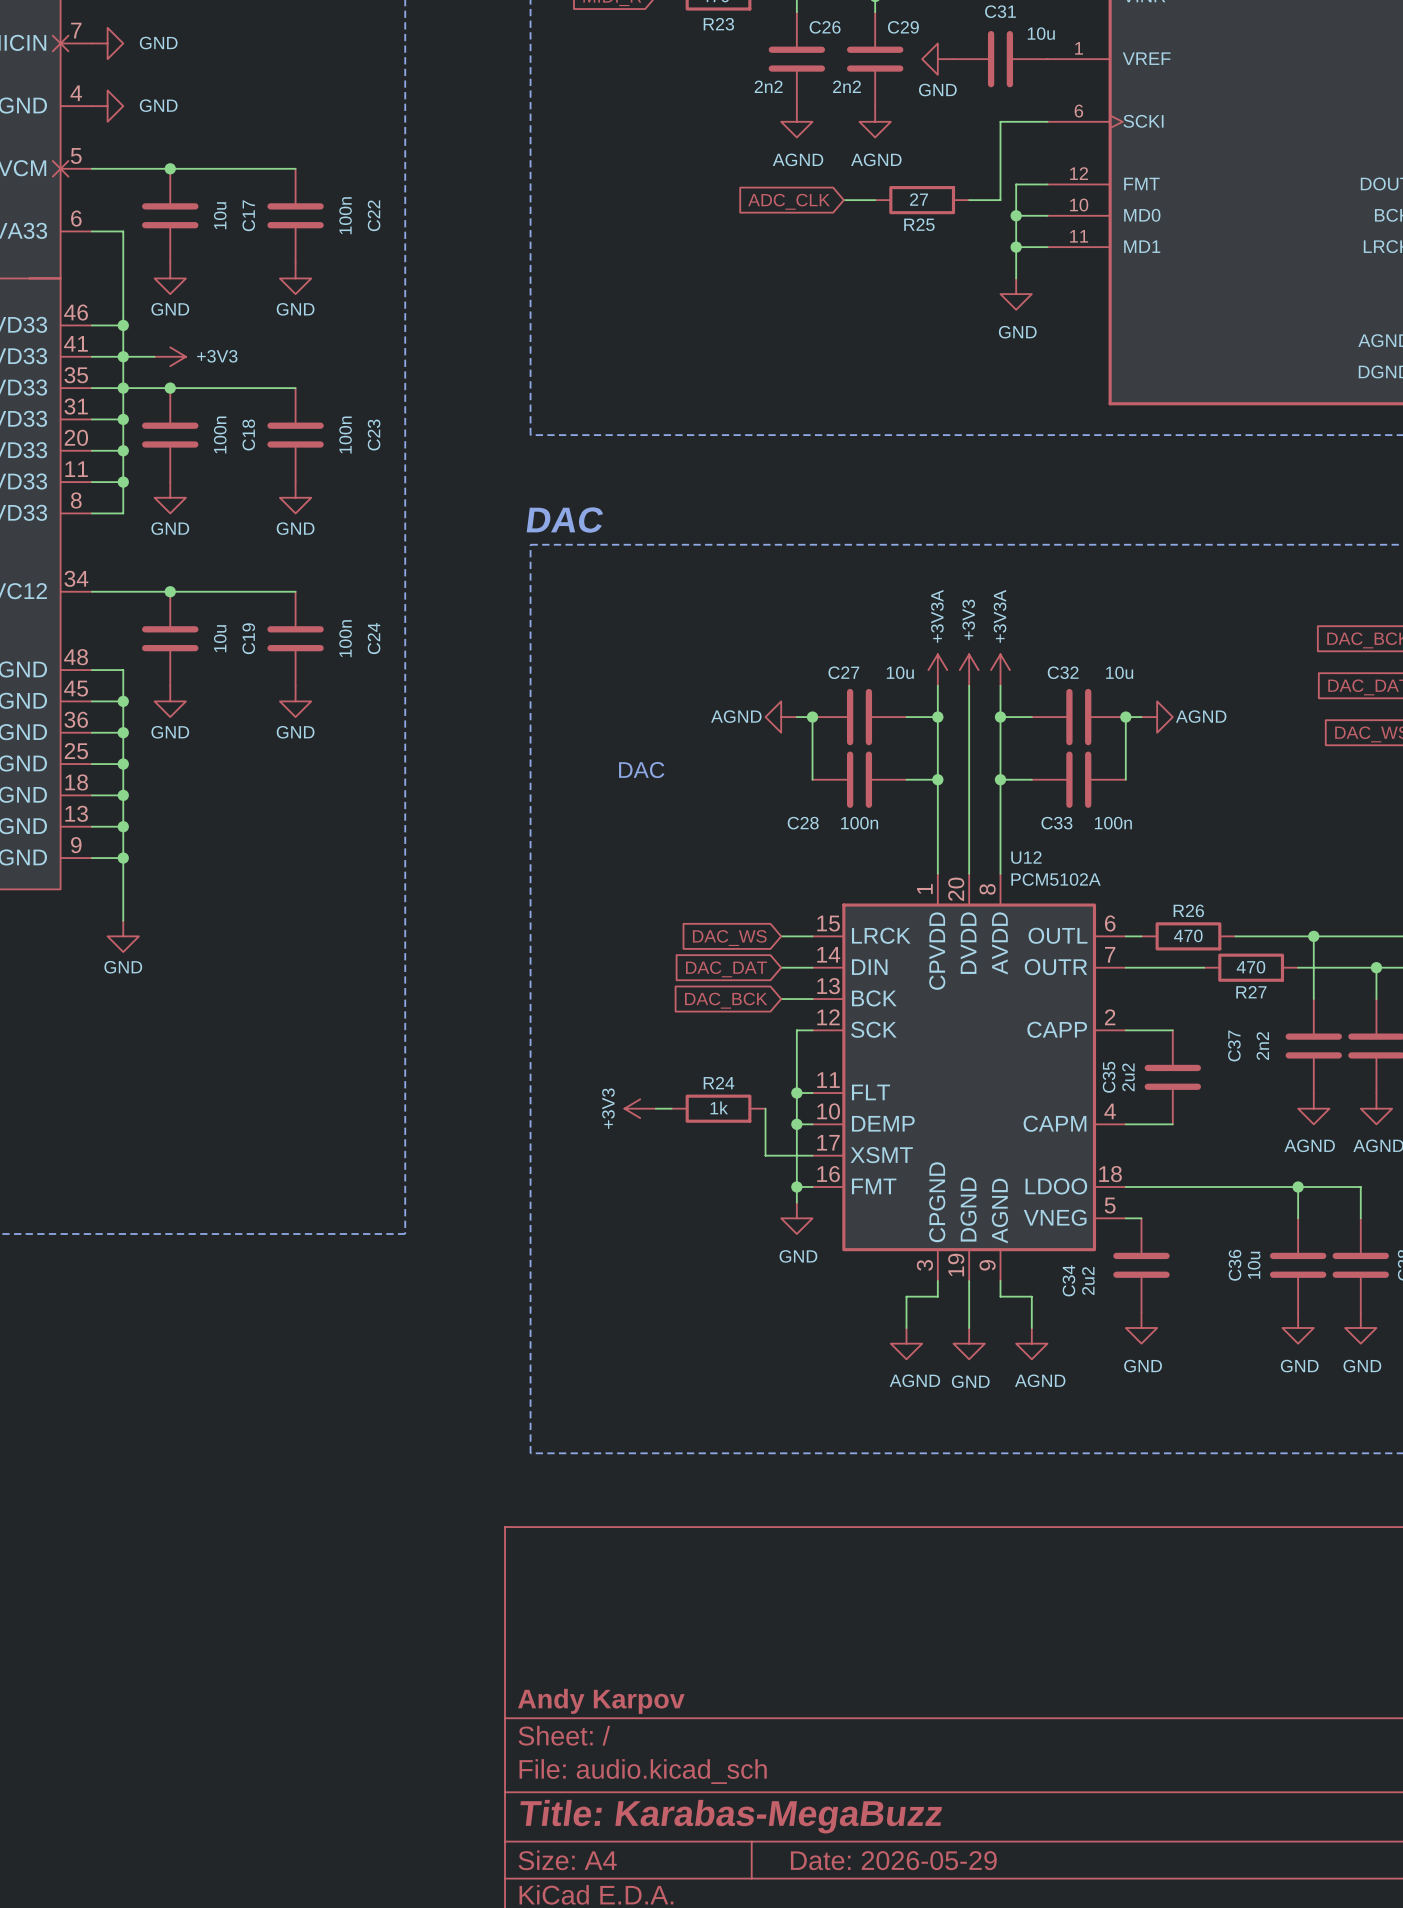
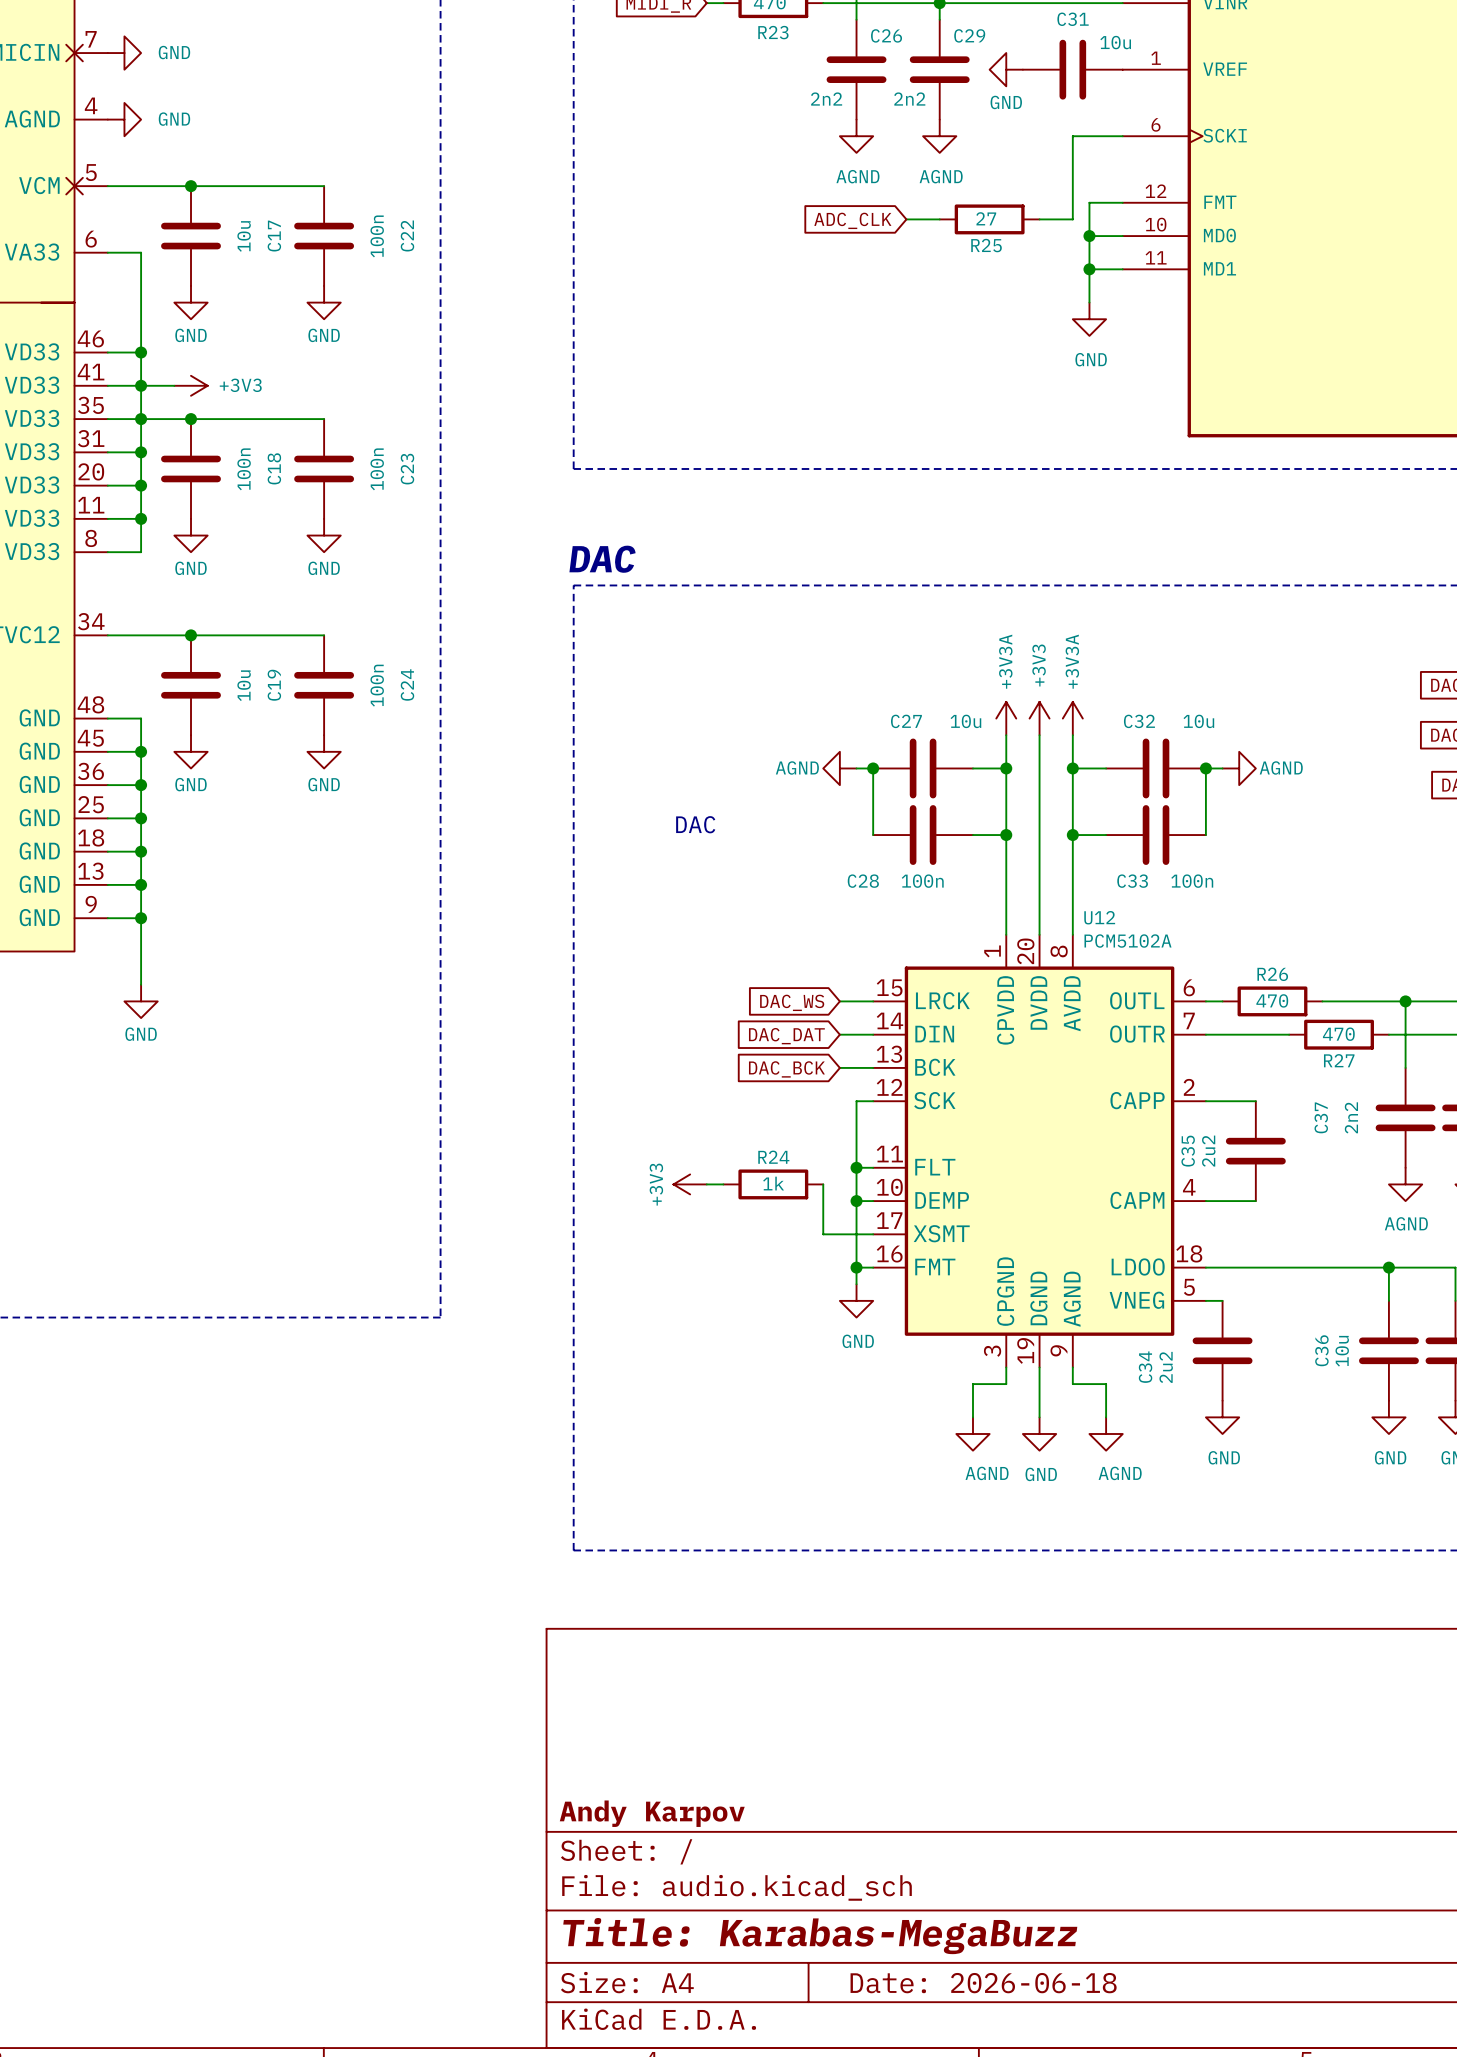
title block: Date: 2026-05-29 (893, 1860) -> Date: 2026-06-18 (983, 1983)

